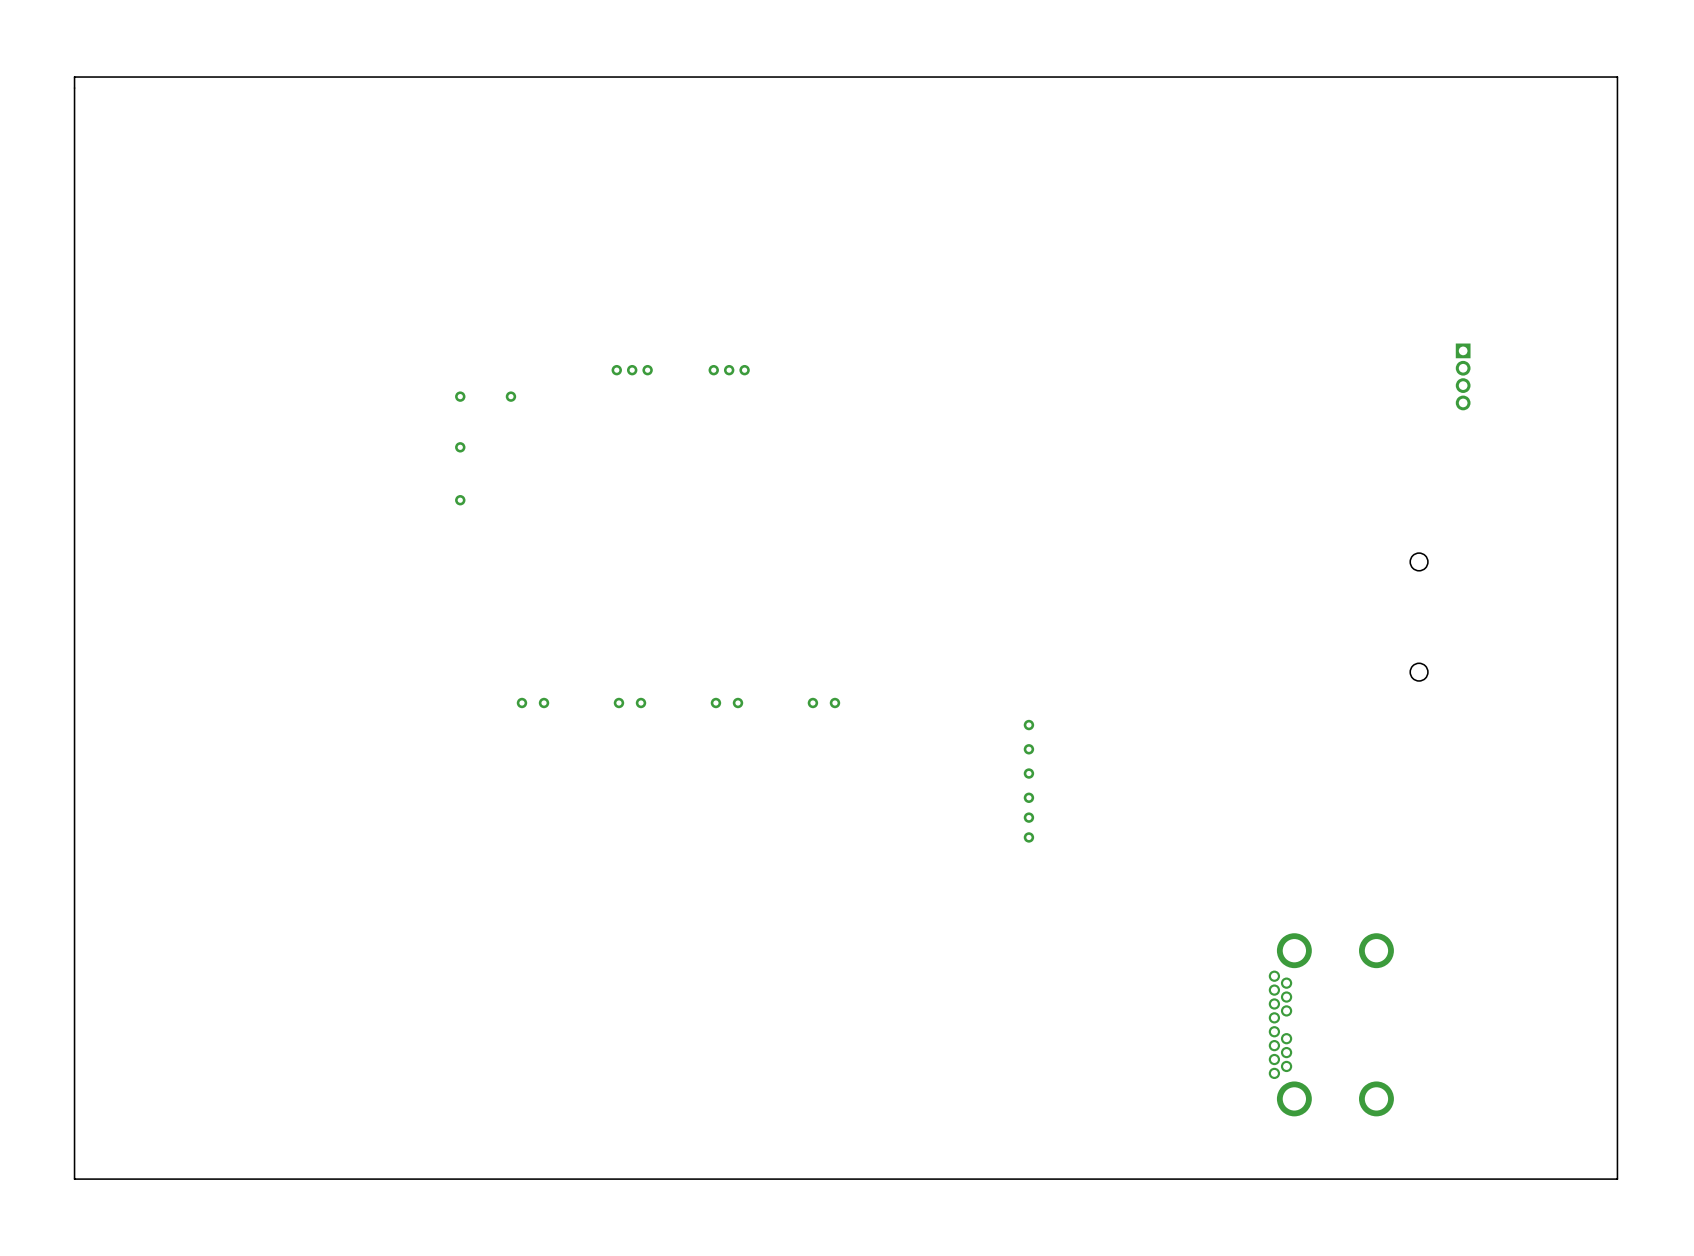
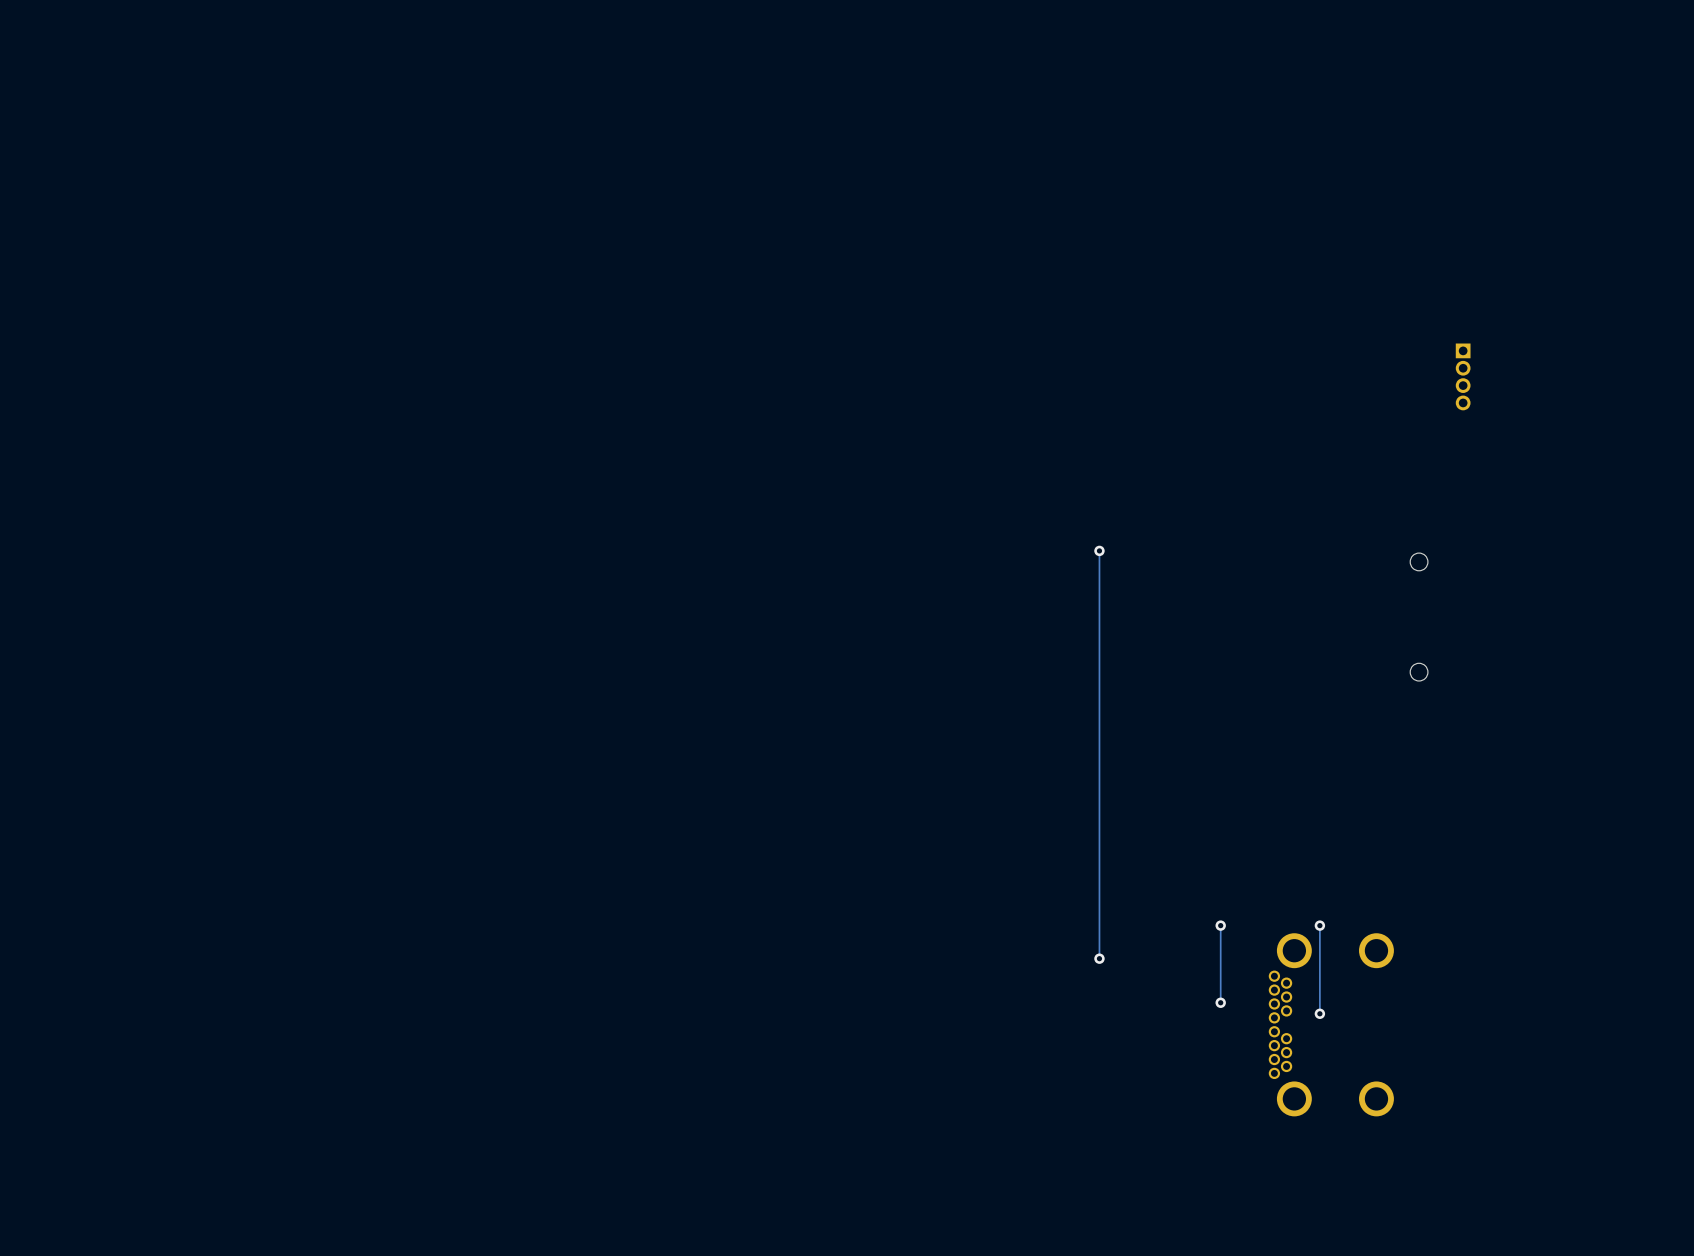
board edge: (1617, 77) (1617, 1179) (74, 1179) (74, 77) (1617, 77) -> none
via: (616, 370) -> none
via: (632, 370) -> none
via: (647, 370) -> none
via: (713, 370) -> none
via: (729, 370) -> none
via: (744, 370) -> none
via: (460, 396) -> none
via: (510, 396) -> none
via: (460, 447) -> none
via: (460, 500) -> none
track: none -> (1099, 550) (1099, 958)
via: none -> (1099, 550)
via: (521, 703) -> none
via: (544, 703) -> none
via: (618, 703) -> none
via: (641, 703) -> none
via: (715, 703) -> none
via: (737, 703) -> none
via: (812, 703) -> none
via: (834, 703) -> none
via: (1028, 725) -> none
via: (1028, 749) -> none
via: (1028, 773) -> none
via: (1028, 797) -> none
via: (1028, 817) -> none
via: (1028, 837) -> none
track: none -> (1220, 925) (1220, 1002)
via: none -> (1220, 925)
track: none -> (1319, 925) (1319, 1013)
via: none -> (1319, 925)
via: none -> (1099, 958)
via: none -> (1220, 1002)
via: none -> (1319, 1013)

